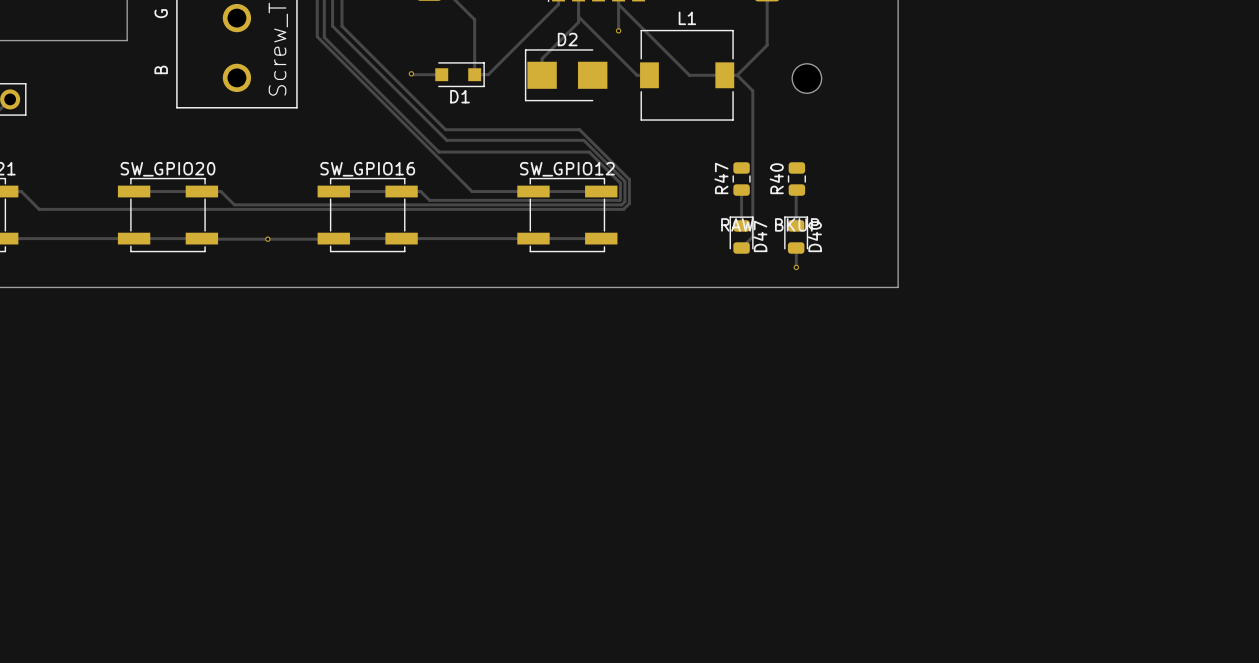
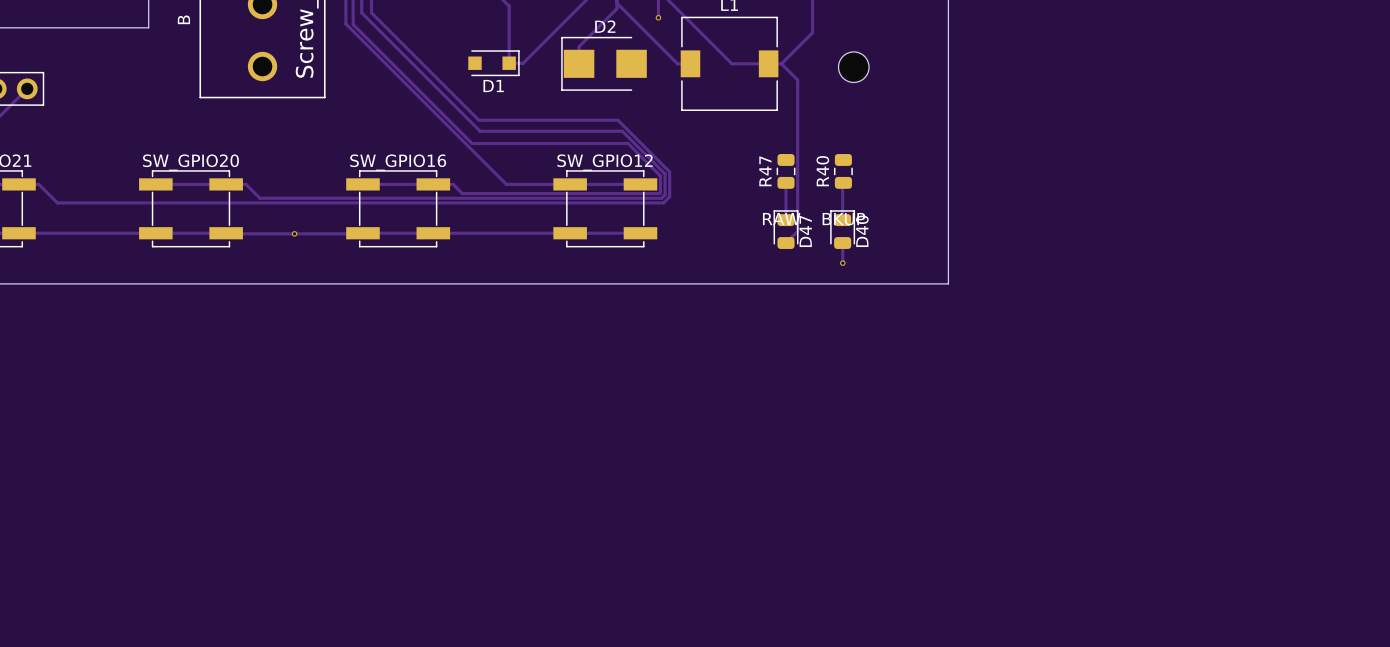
track: (411, 73) (441, 74) -> none
via: (411, 73) -> none

